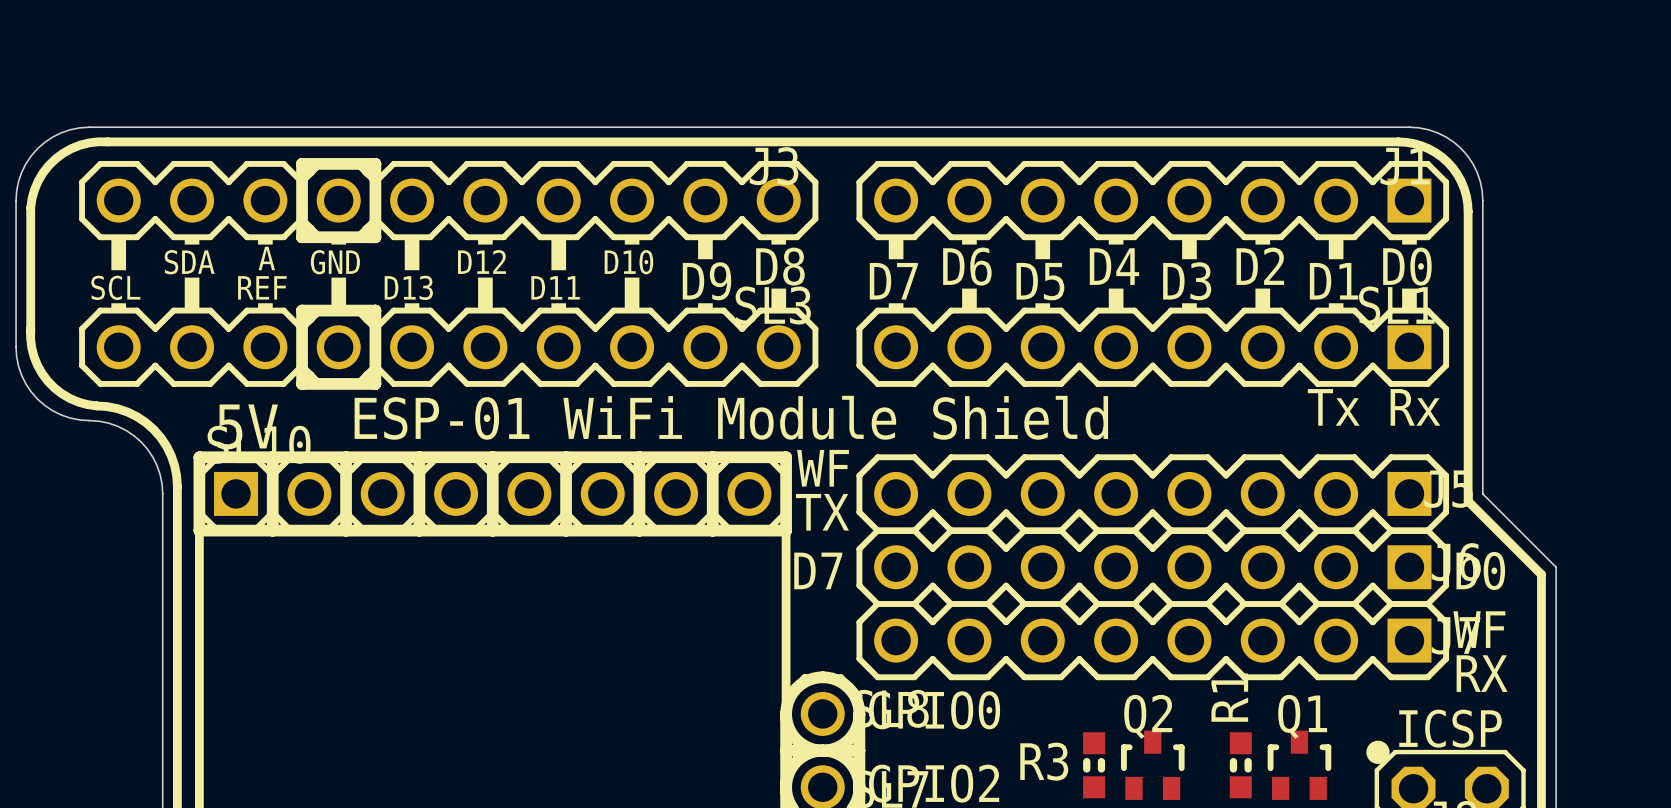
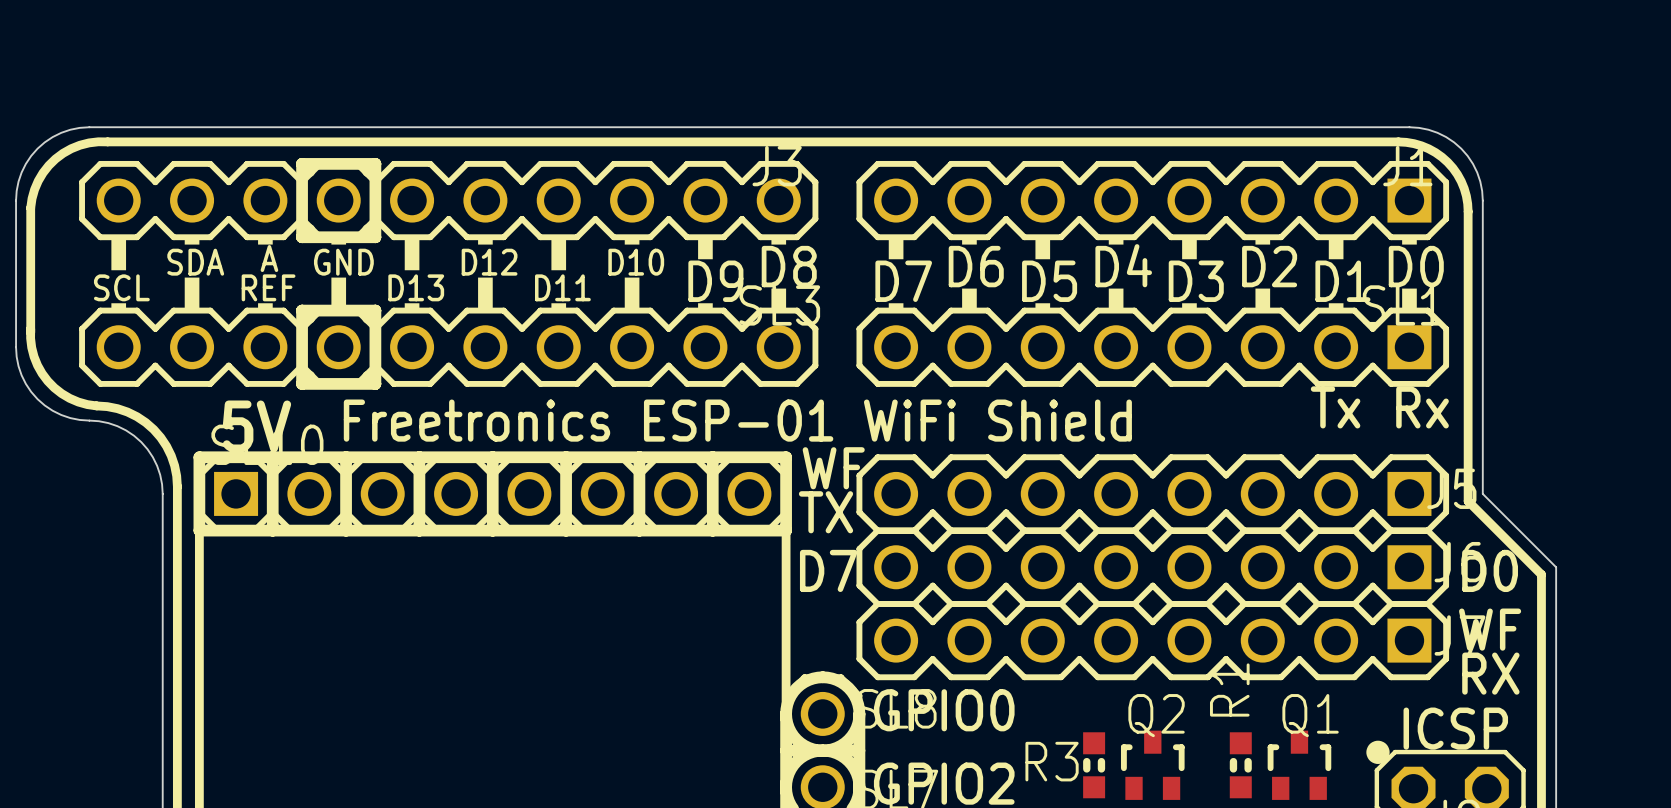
text: ESP-01 WiFi Module Shield (731, 417) -> Freetronics ESP-01 WiFi Shield (737, 420)

